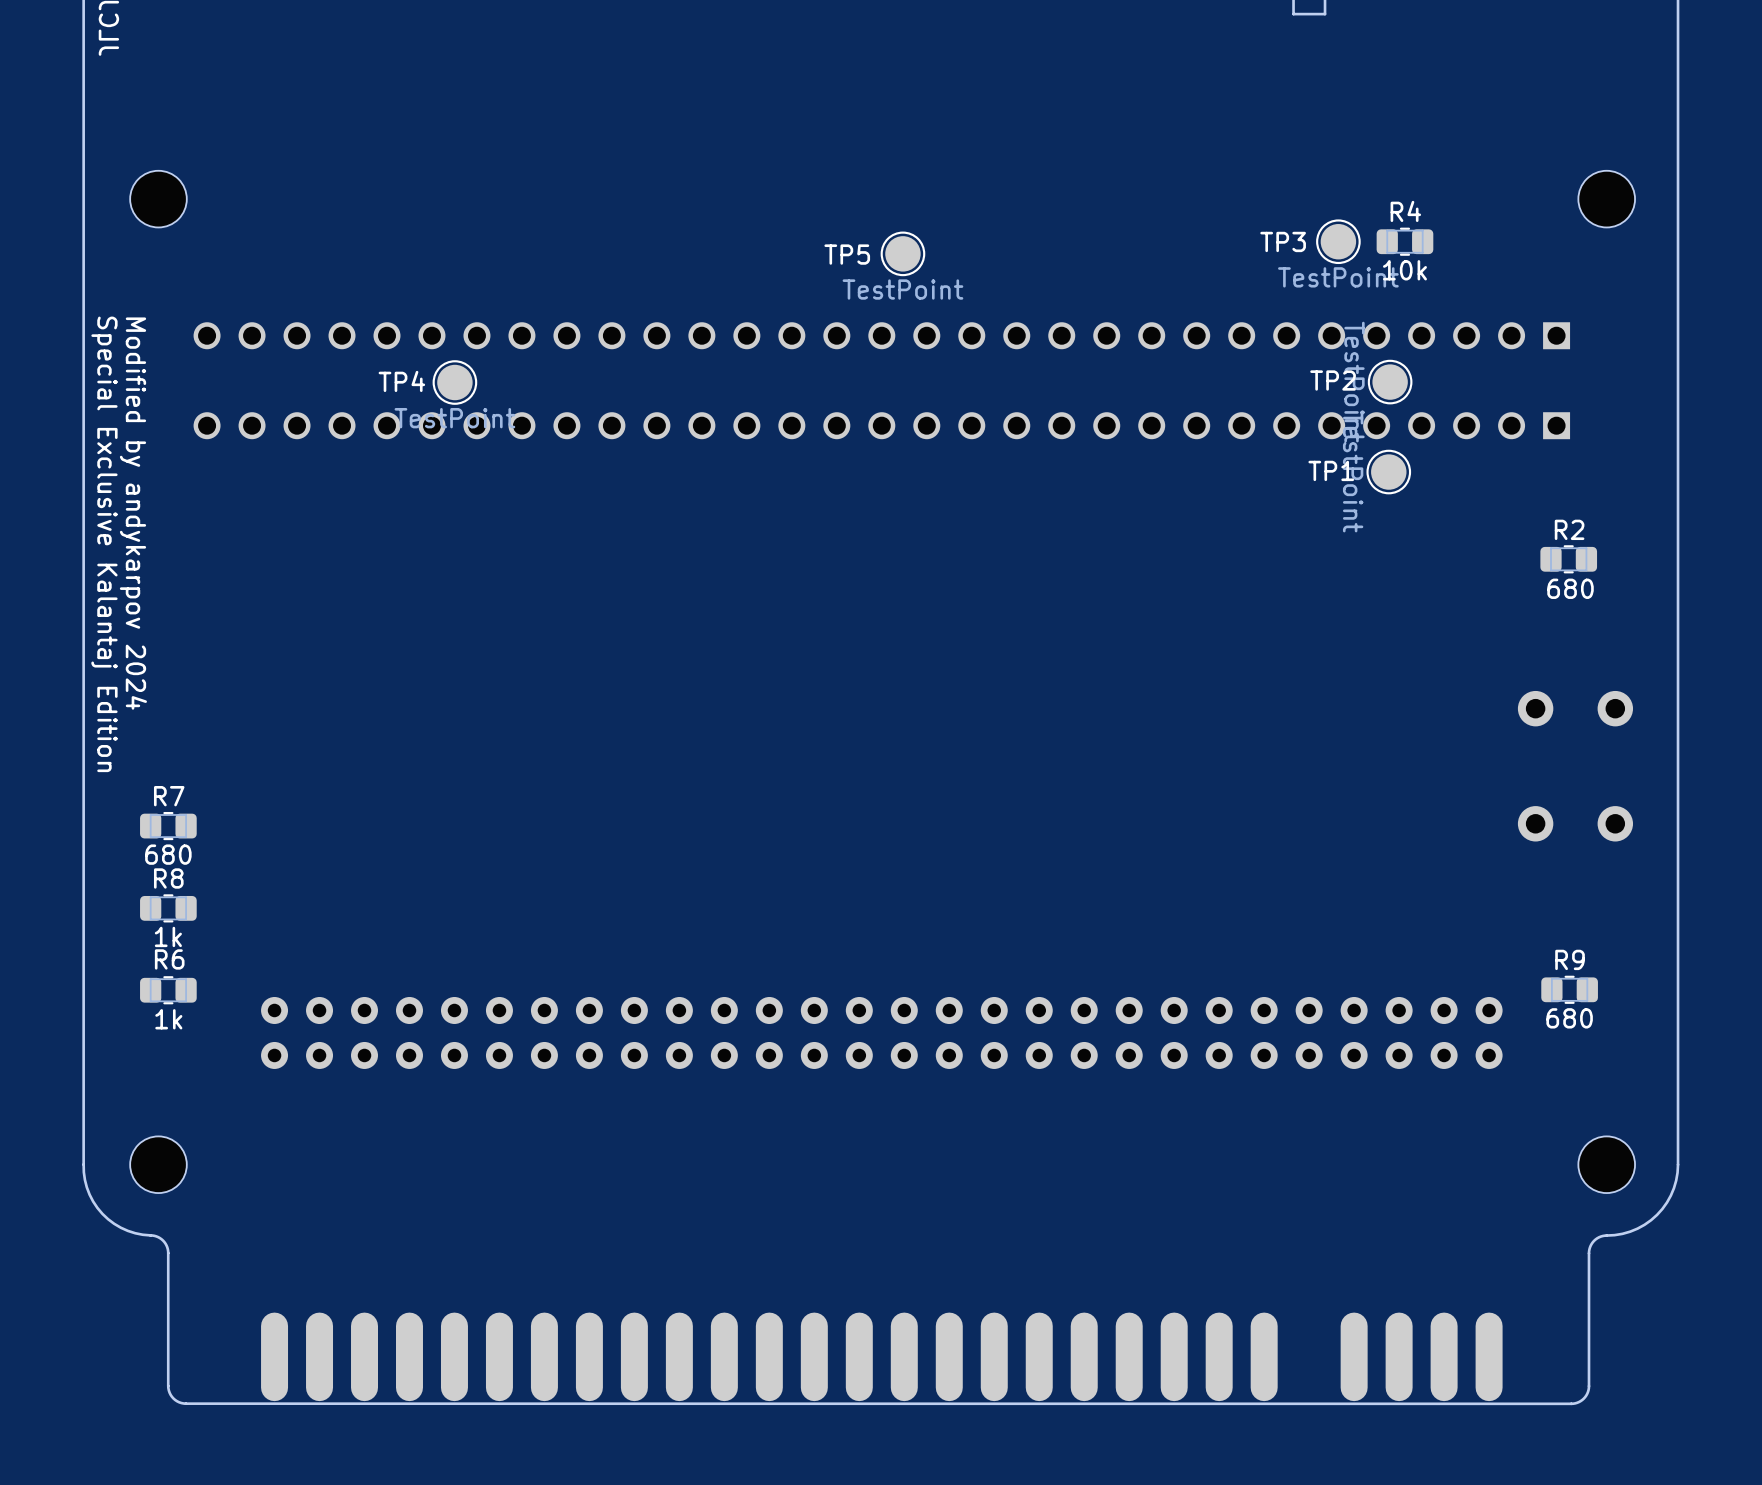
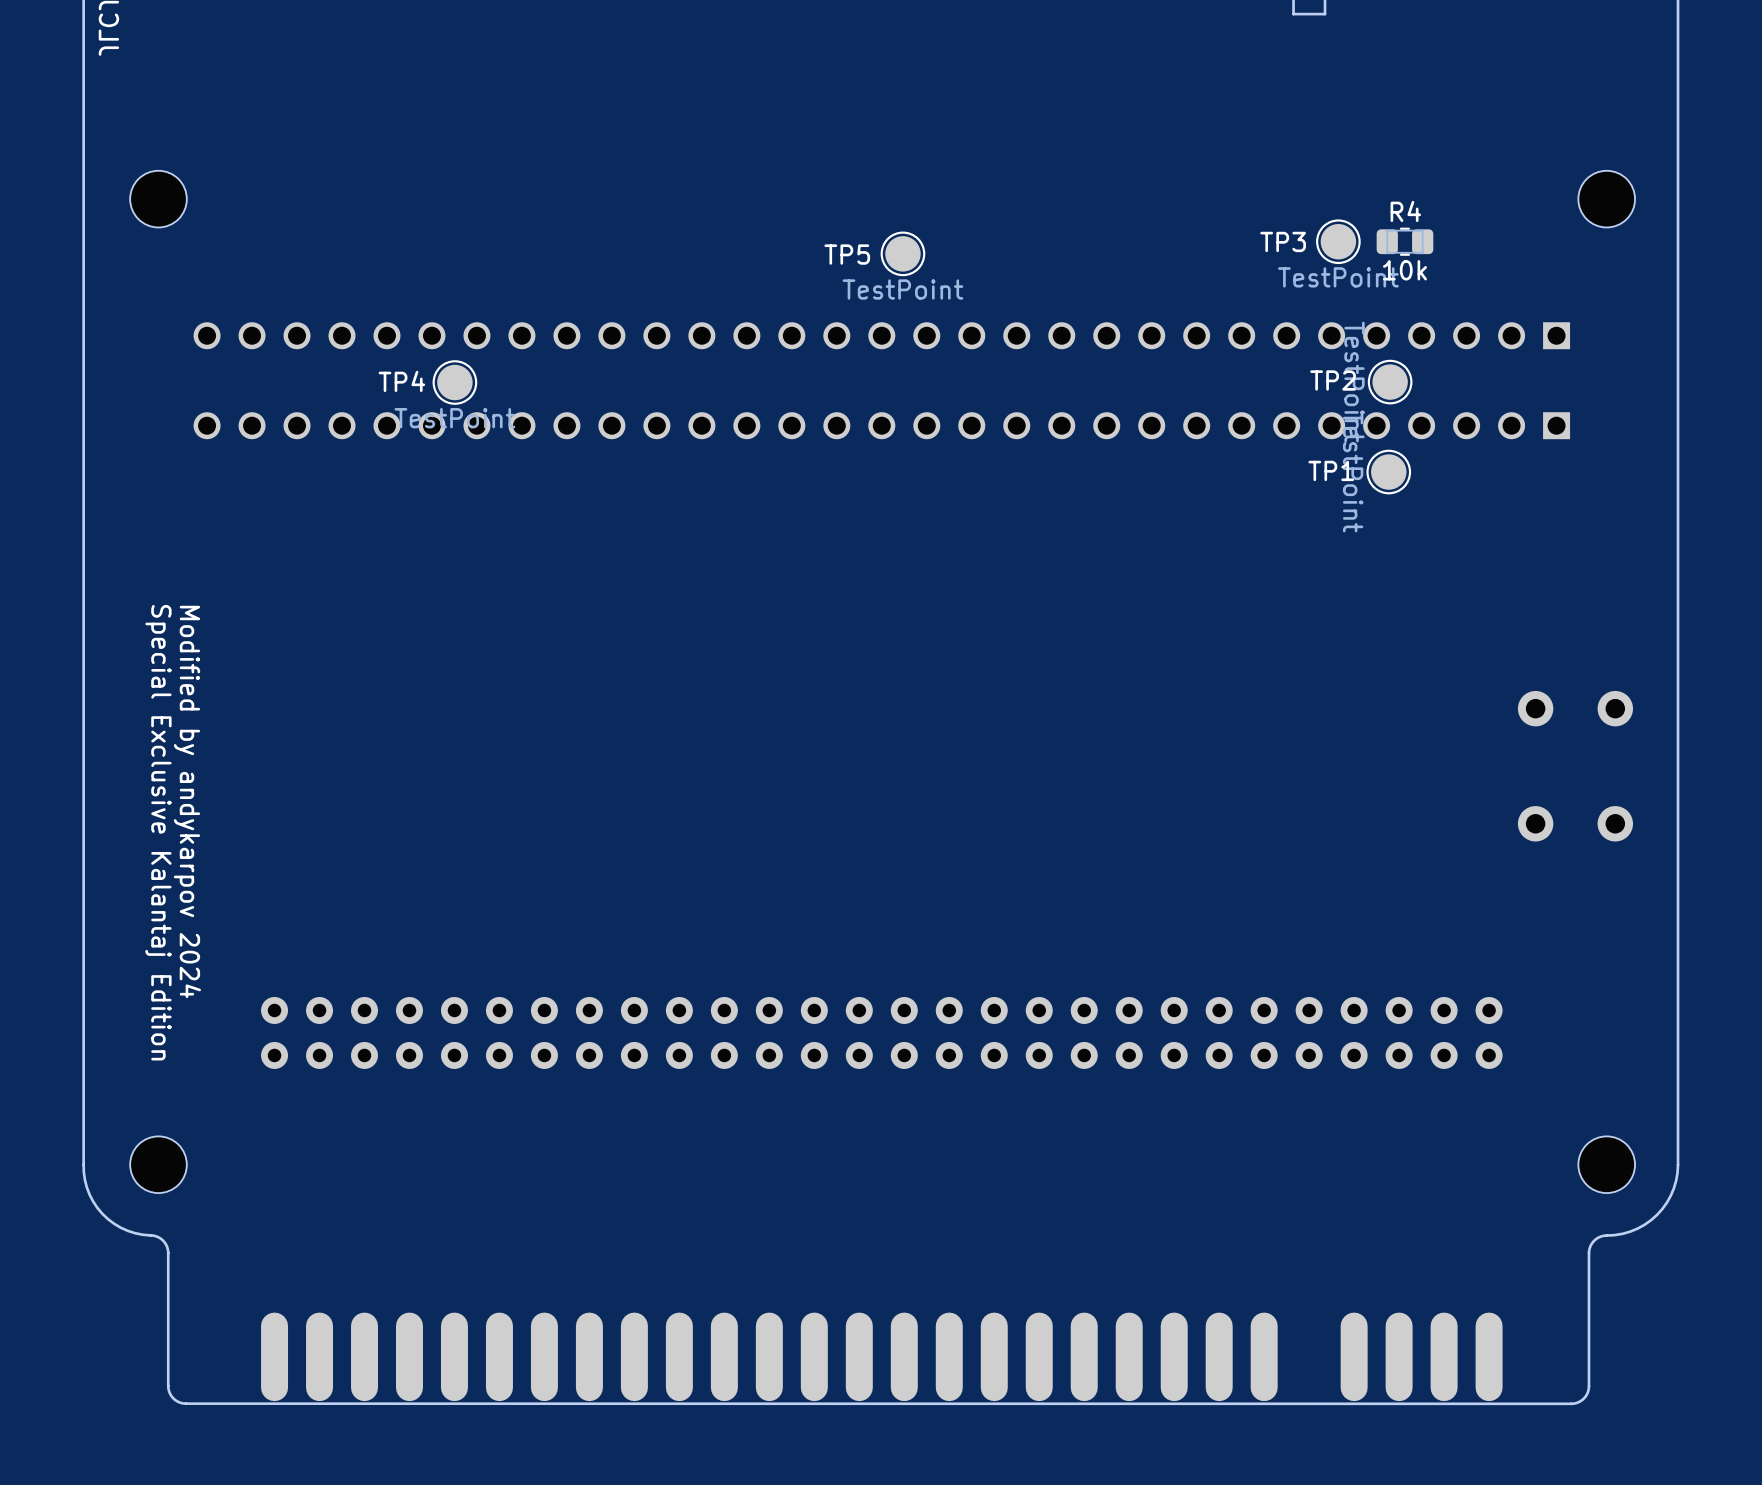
text position: Modified by andykarpov 2024 (133, 513) -> Modified by andykarpov 2024 (187, 801)
text position: Special Exclusive Kalantaj Edition (104, 544) -> Special Exclusive Kalantaj Edition (158, 832)
R2: 680 (1568, 559) -> none
R7: 680 (168, 826) -> none
R8: 1k (168, 908) -> none
R9: 680 (1569, 989) -> none
R6: 1k (168, 990) -> none

